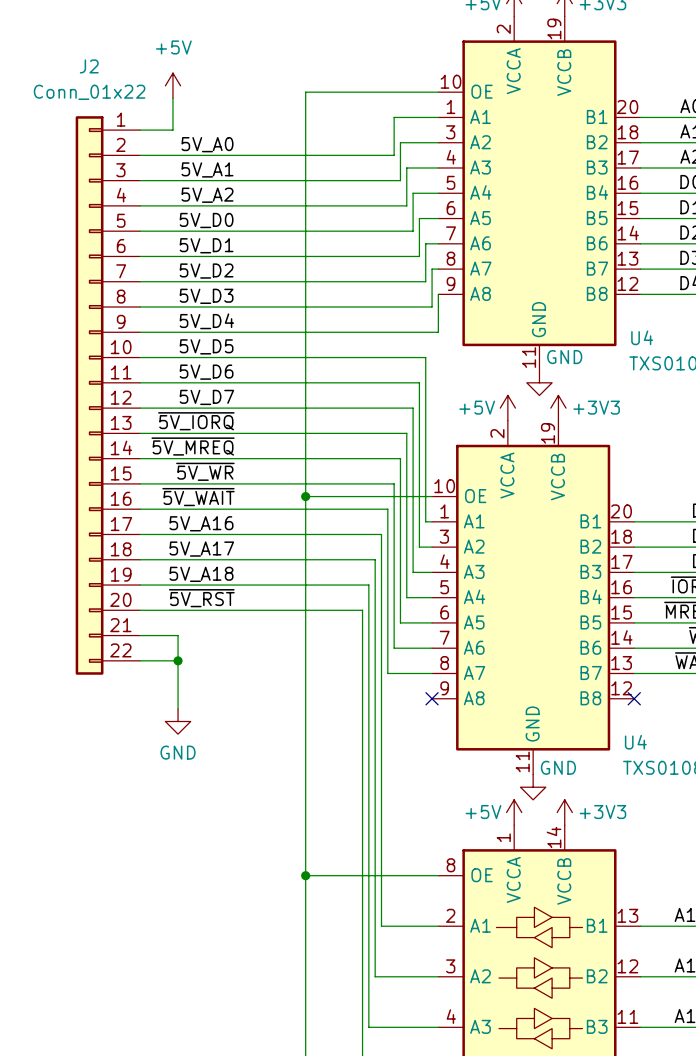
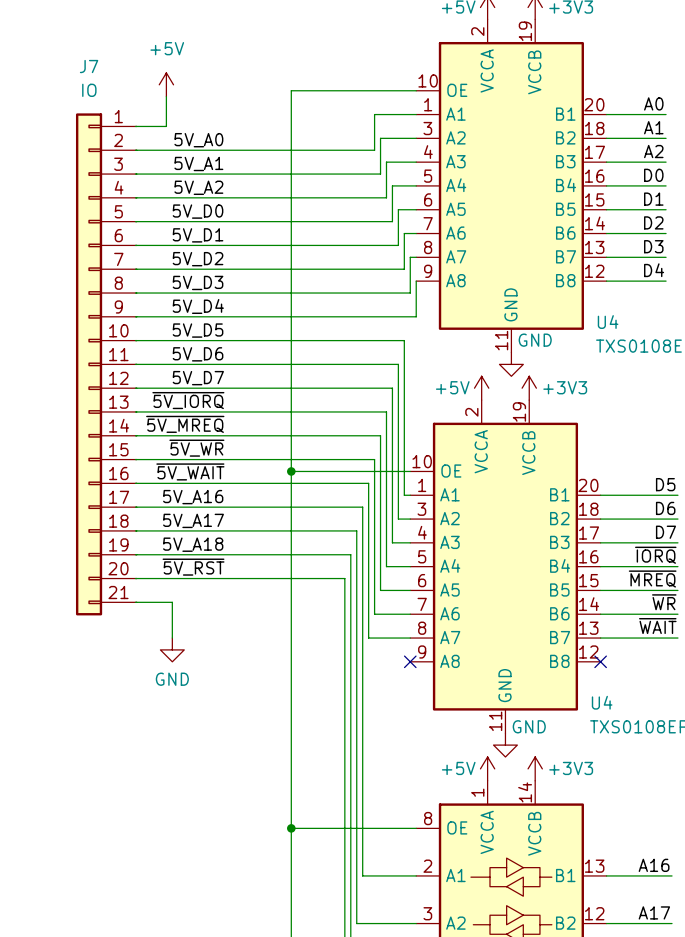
J7: none -> IO (106, 364)
J2: Conn_01x22 (107, 395) -> none
wire: (178, 635) (178, 708) -> (171, 602) (172, 638)
wire: (140, 660) (178, 660) -> none
junction: (178, 660) -> none
power symbol position: GND (178, 721) -> GND (172, 649)

